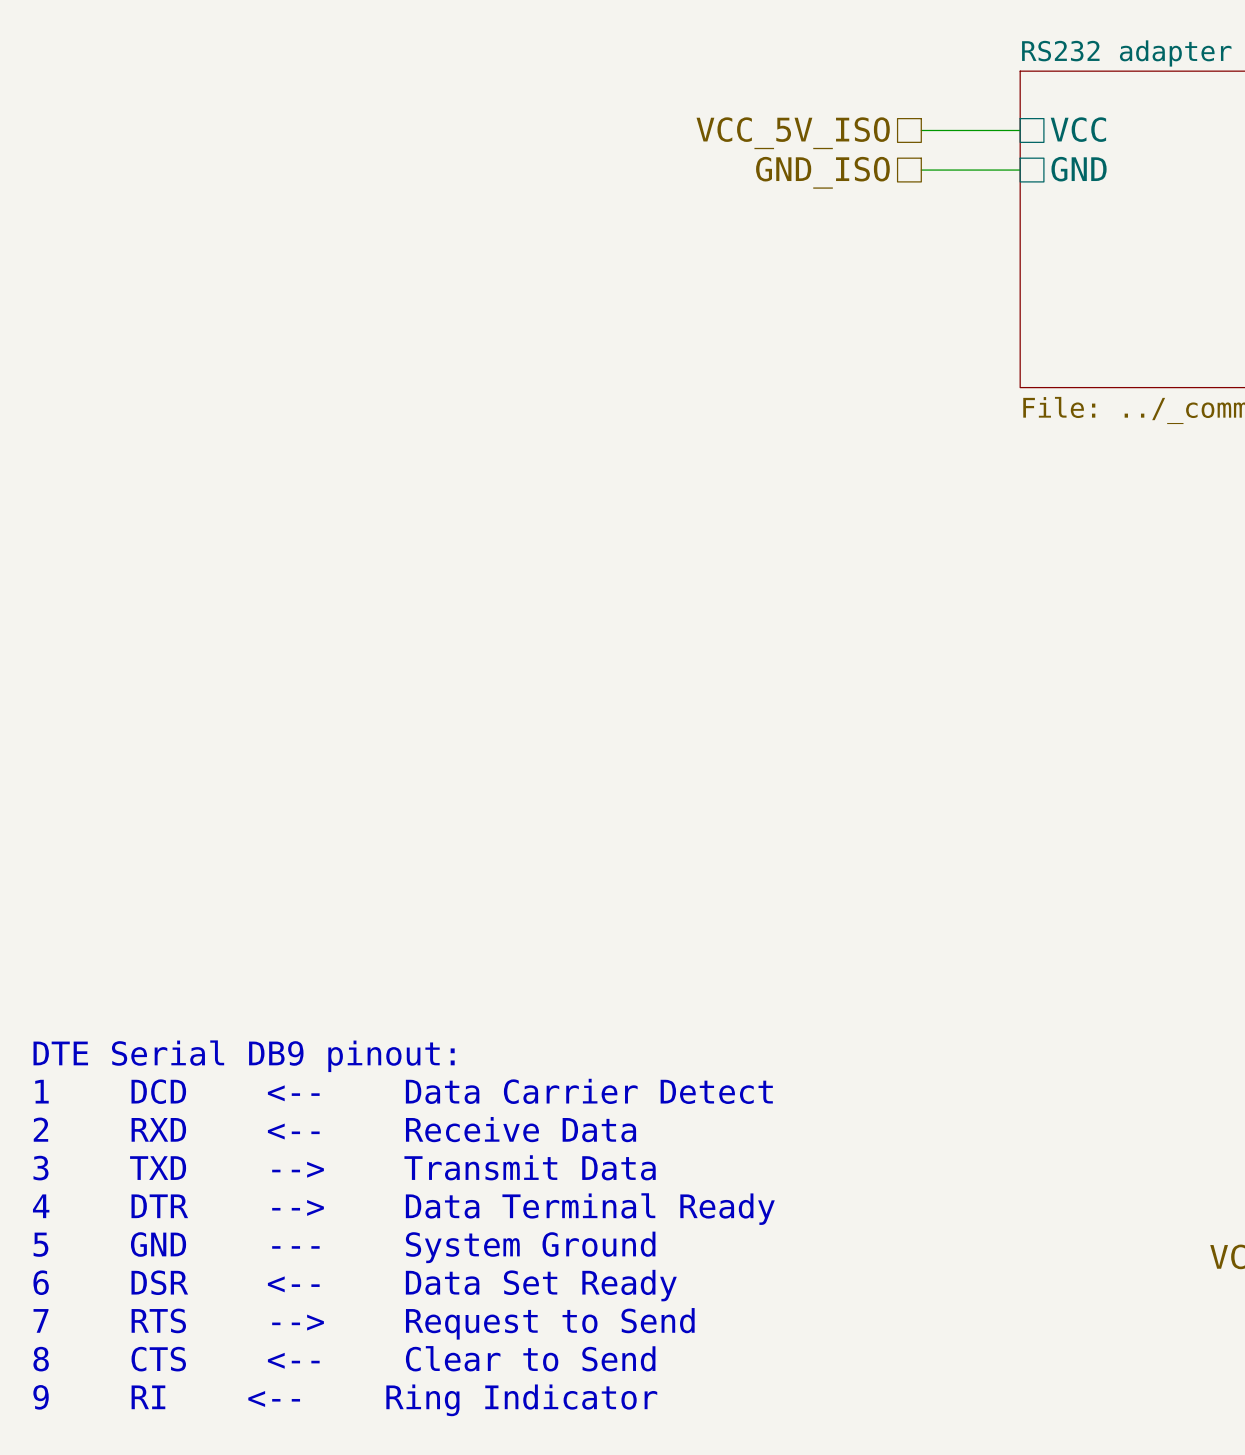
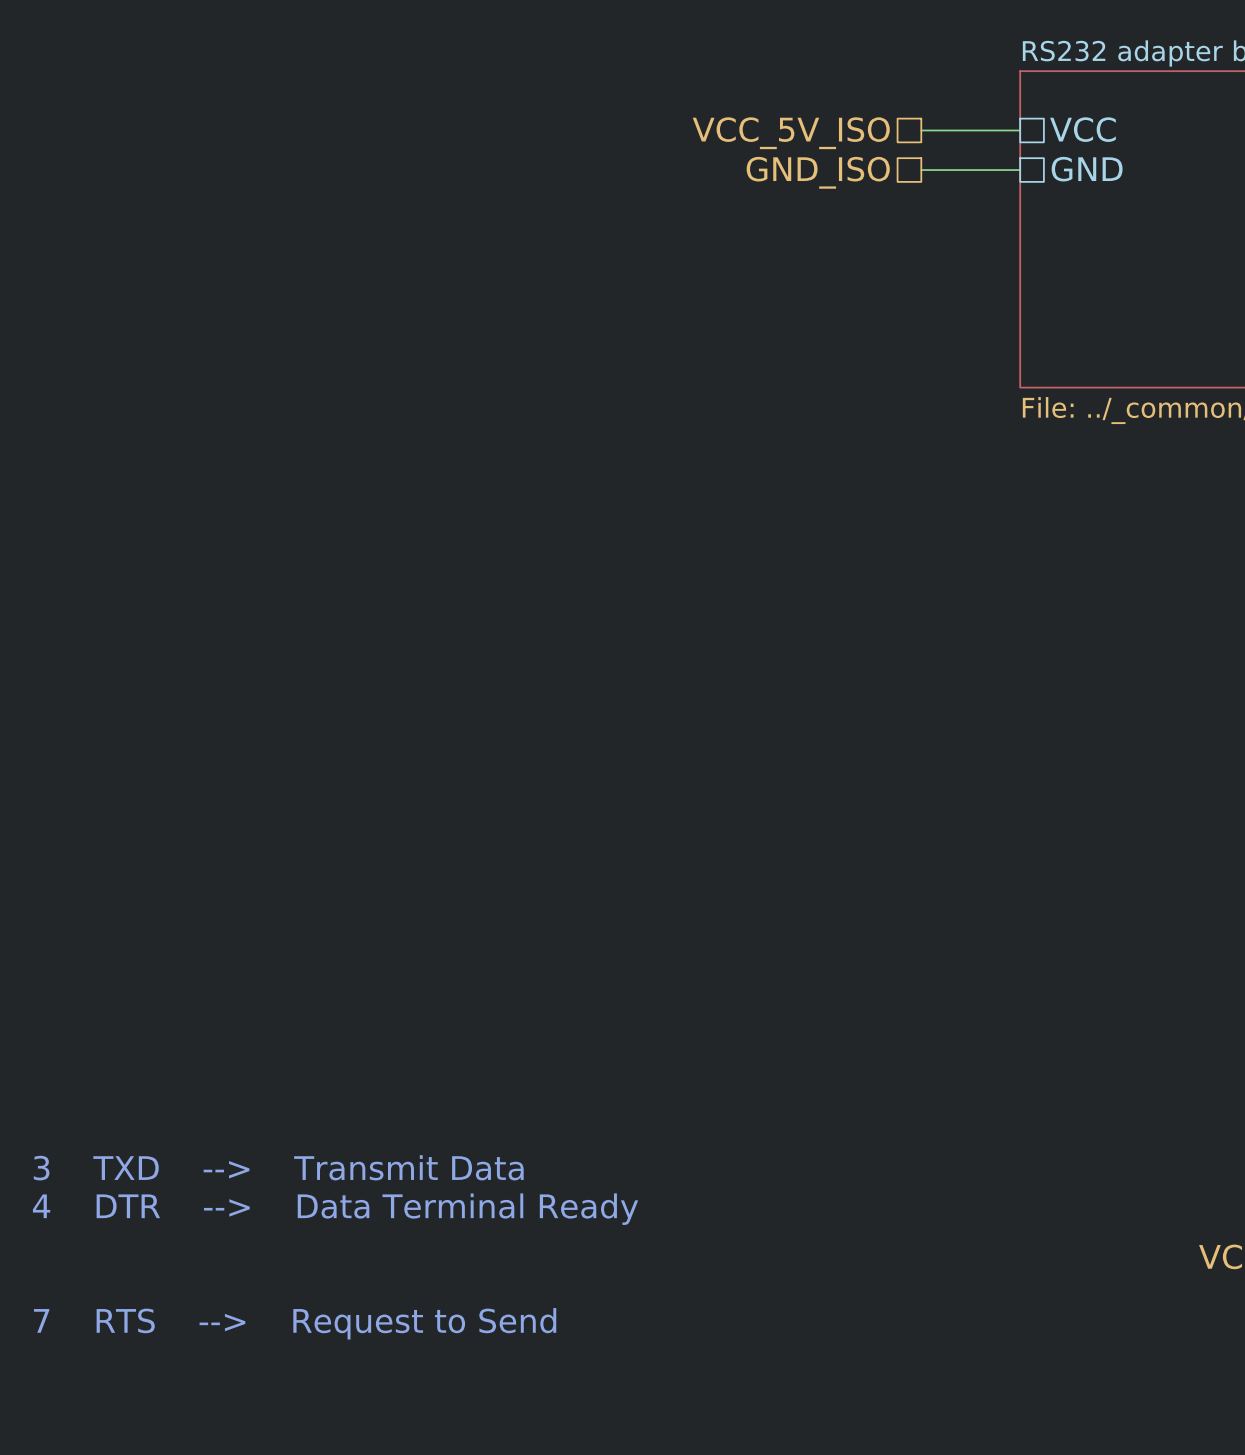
text: DTE Serial DB9 pinout: (244, 1056) -> none
text: 1 DCD <-- Data Carrier Detect (404, 1091) -> none
text: 2 RXD <-- Receive Data (334, 1129) -> none
text: 5 GND --- System Ground (344, 1247) -> none
text: 6 DSR <-- Data Set Ready (355, 1285) -> none
text: 8 CTS <-- Clear to Send (344, 1358) -> none
text: 9 RI <-- Ring Indicator (345, 1400) -> none

